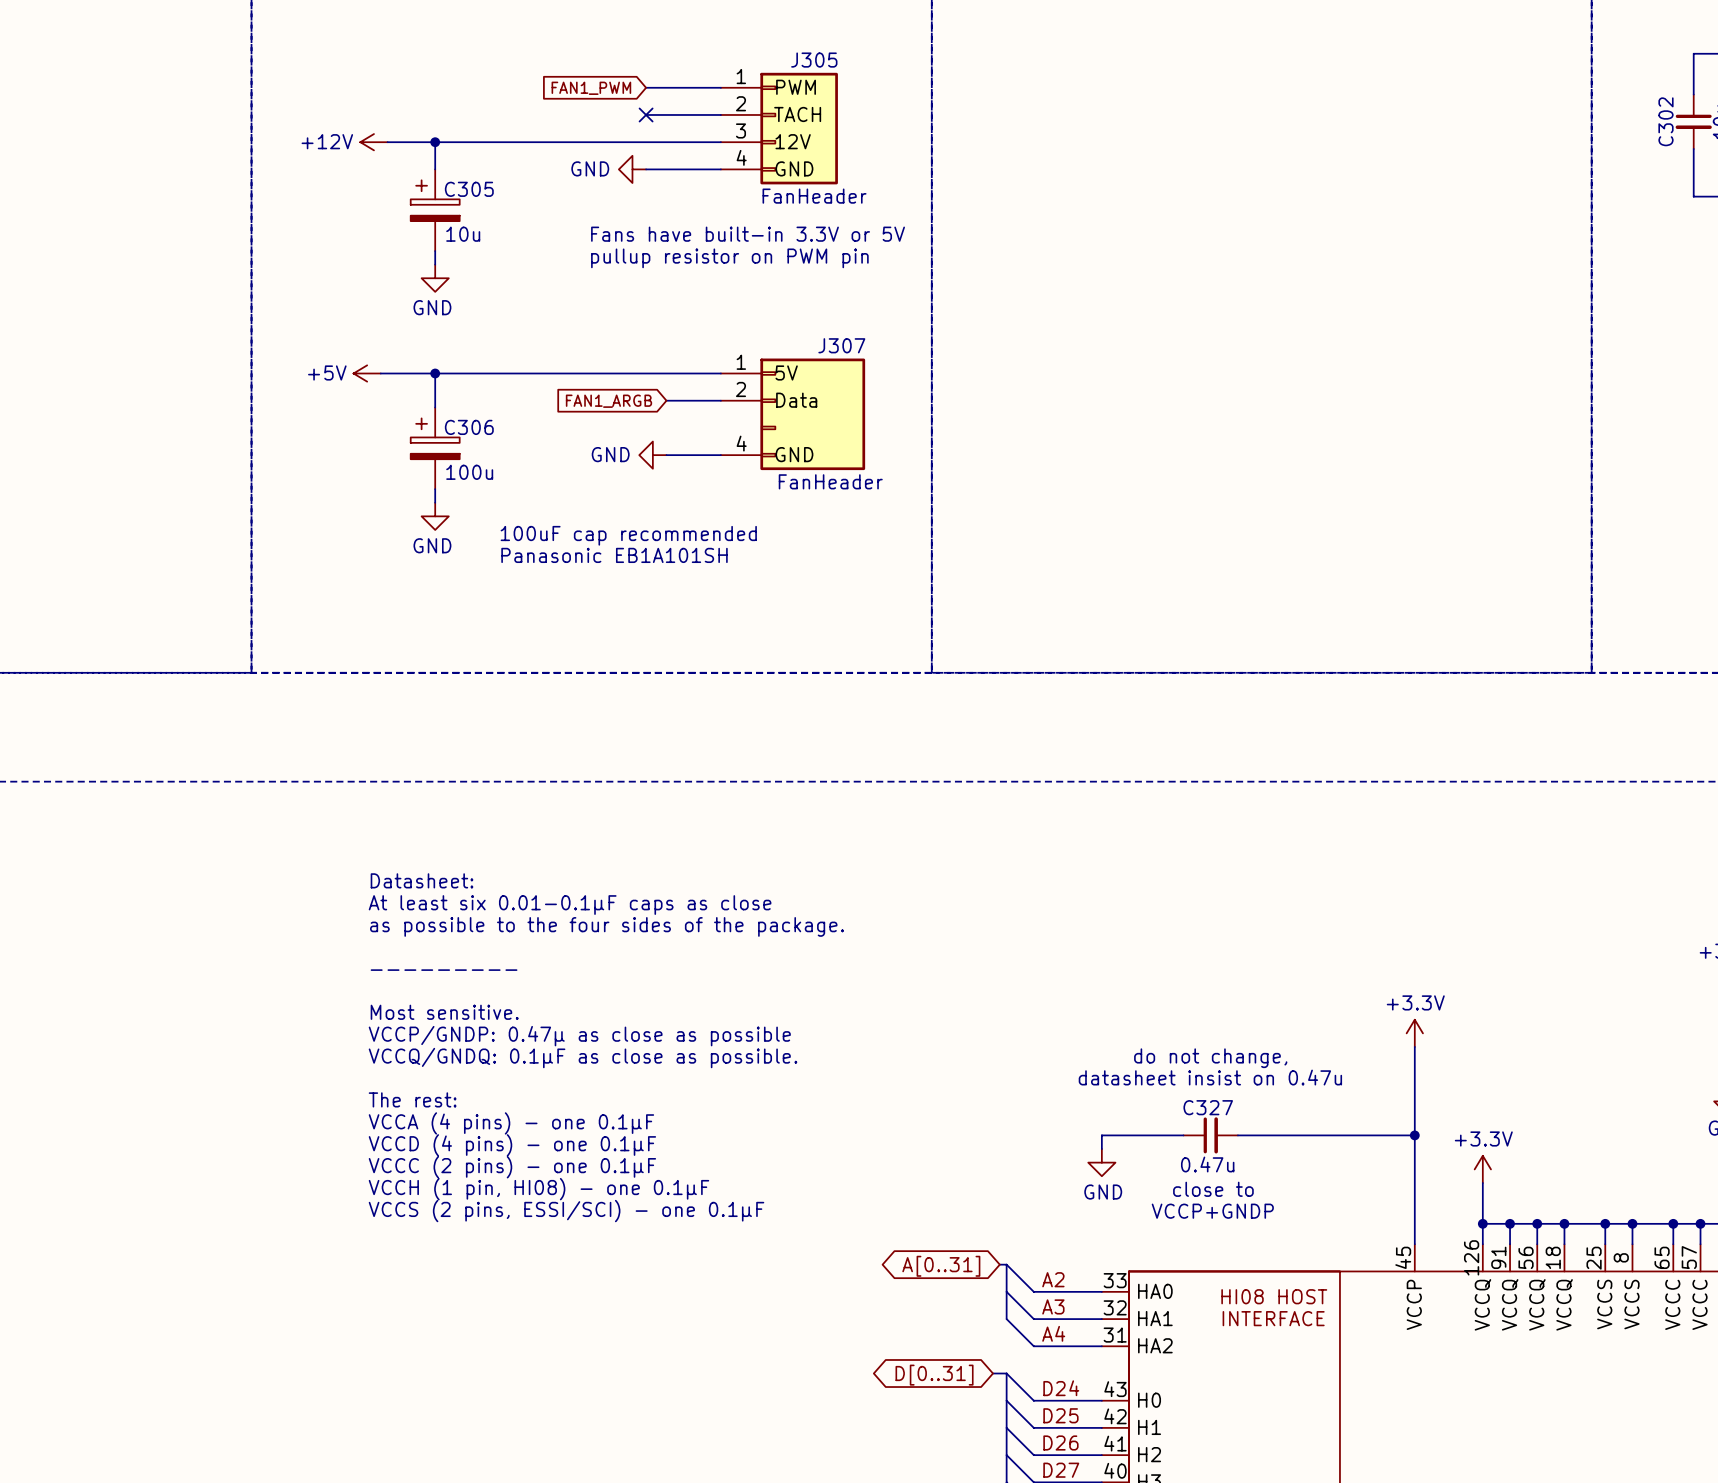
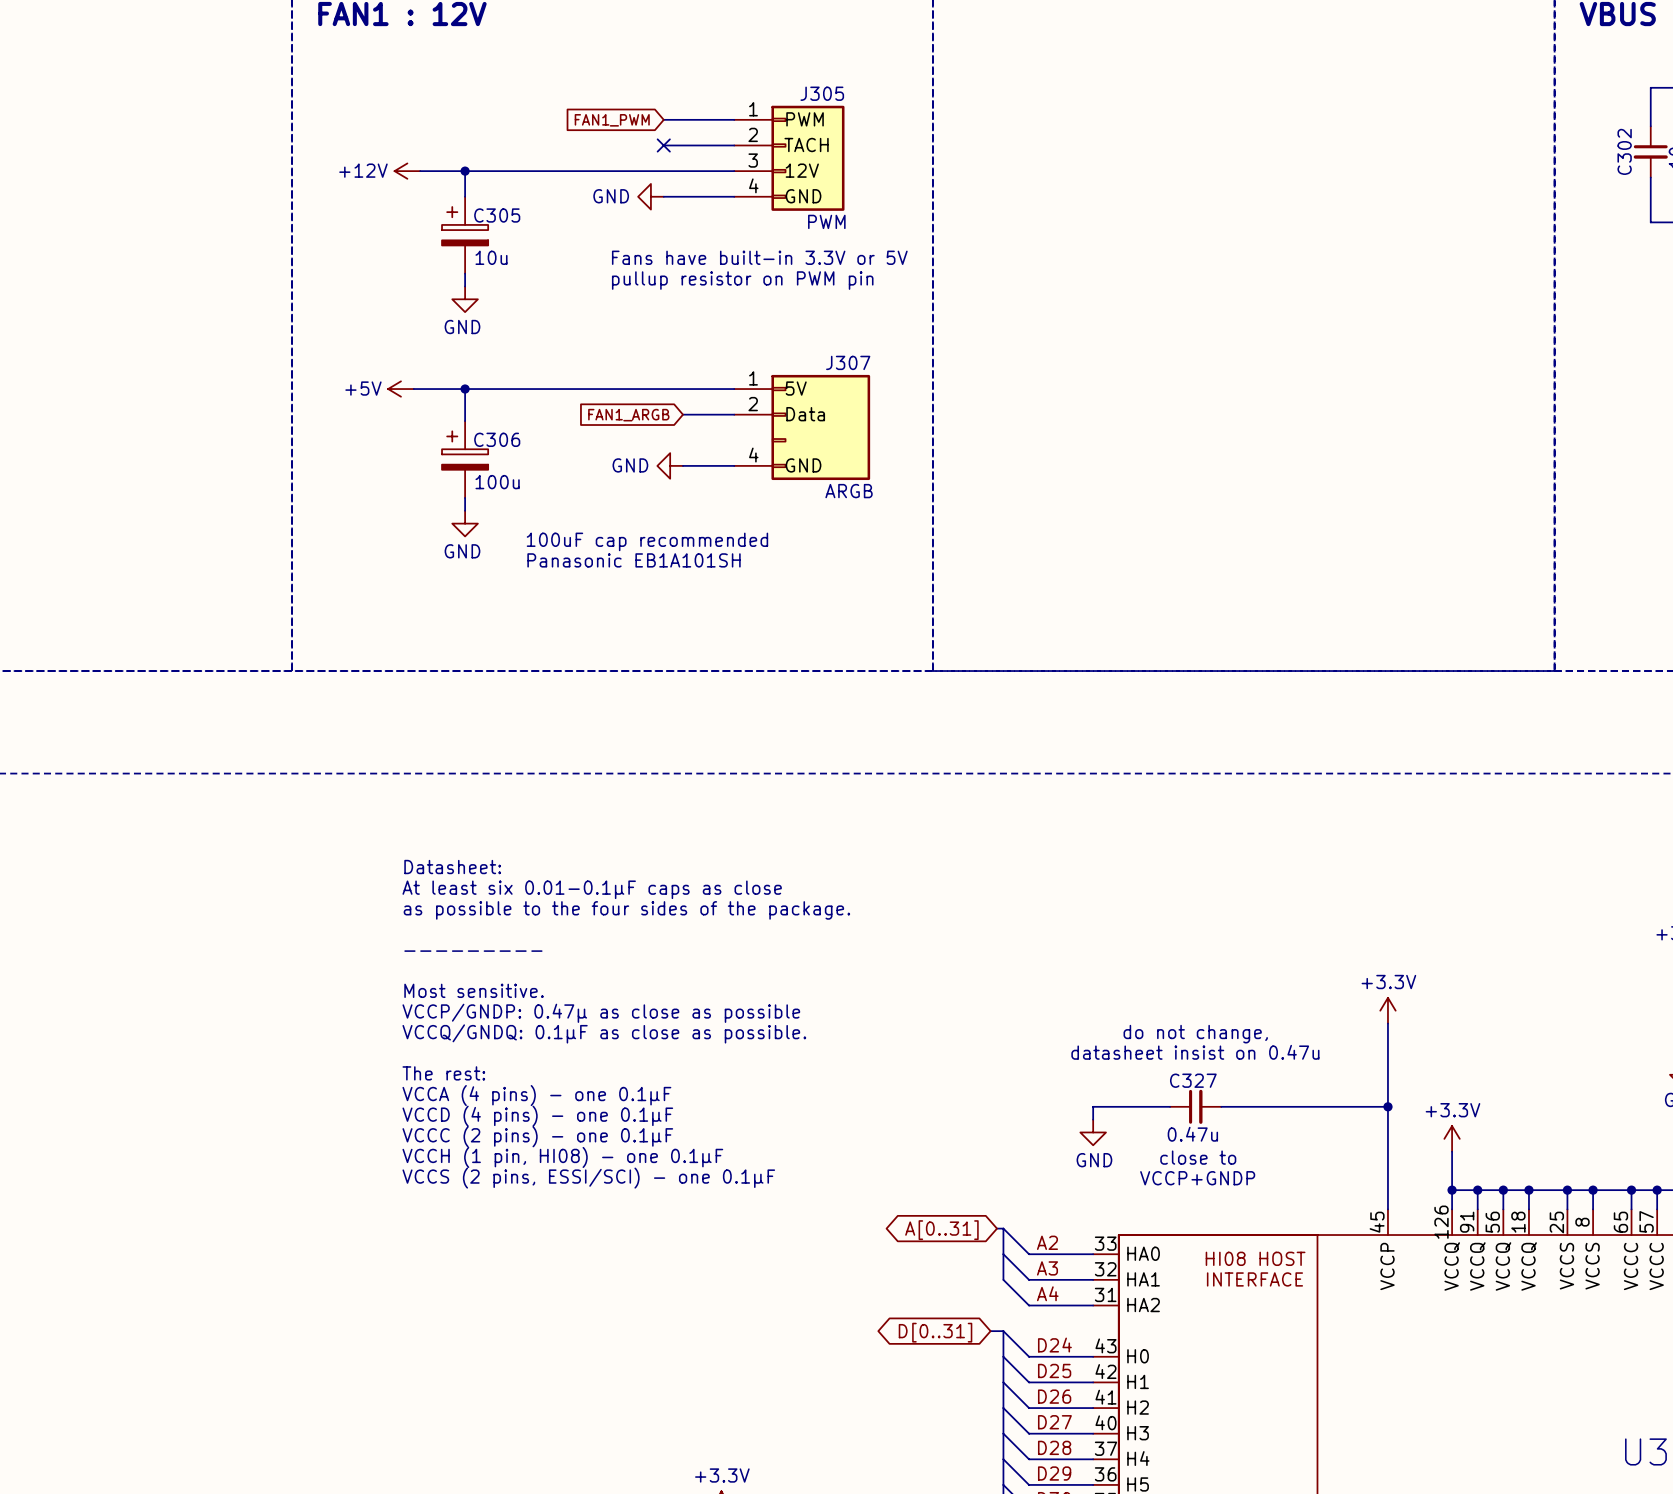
J305 value: FanHeader (814, 196) -> PWM (826, 221)
J307 value: FanHeader (830, 481) -> ARGB (849, 491)

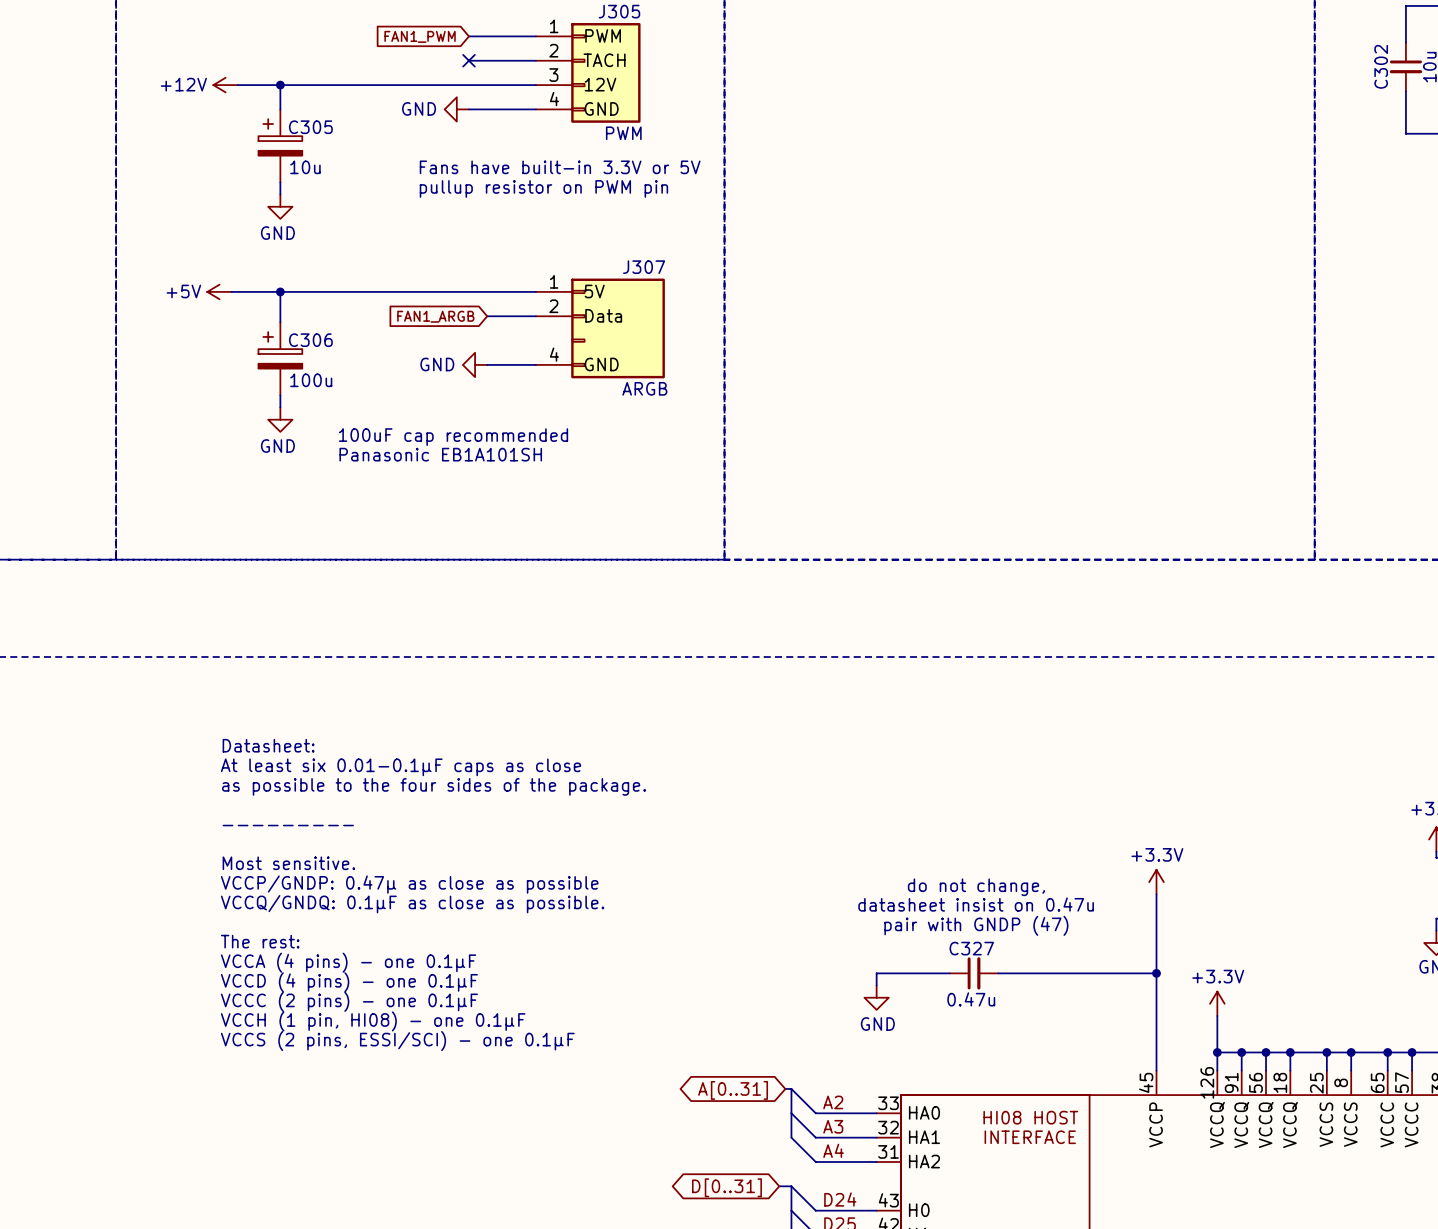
text: none -> do not change, (976, 887)
text: do not change, (1195, 1034) -> datasheet insist on 0.47u (976, 904)
text: datasheet insist on 0.47u (1195, 1052) -> pair with GNDP (47) (976, 925)
text: close to (1198, 1157) -> none
text: VCCP+GNDP (1197, 1178) -> none

